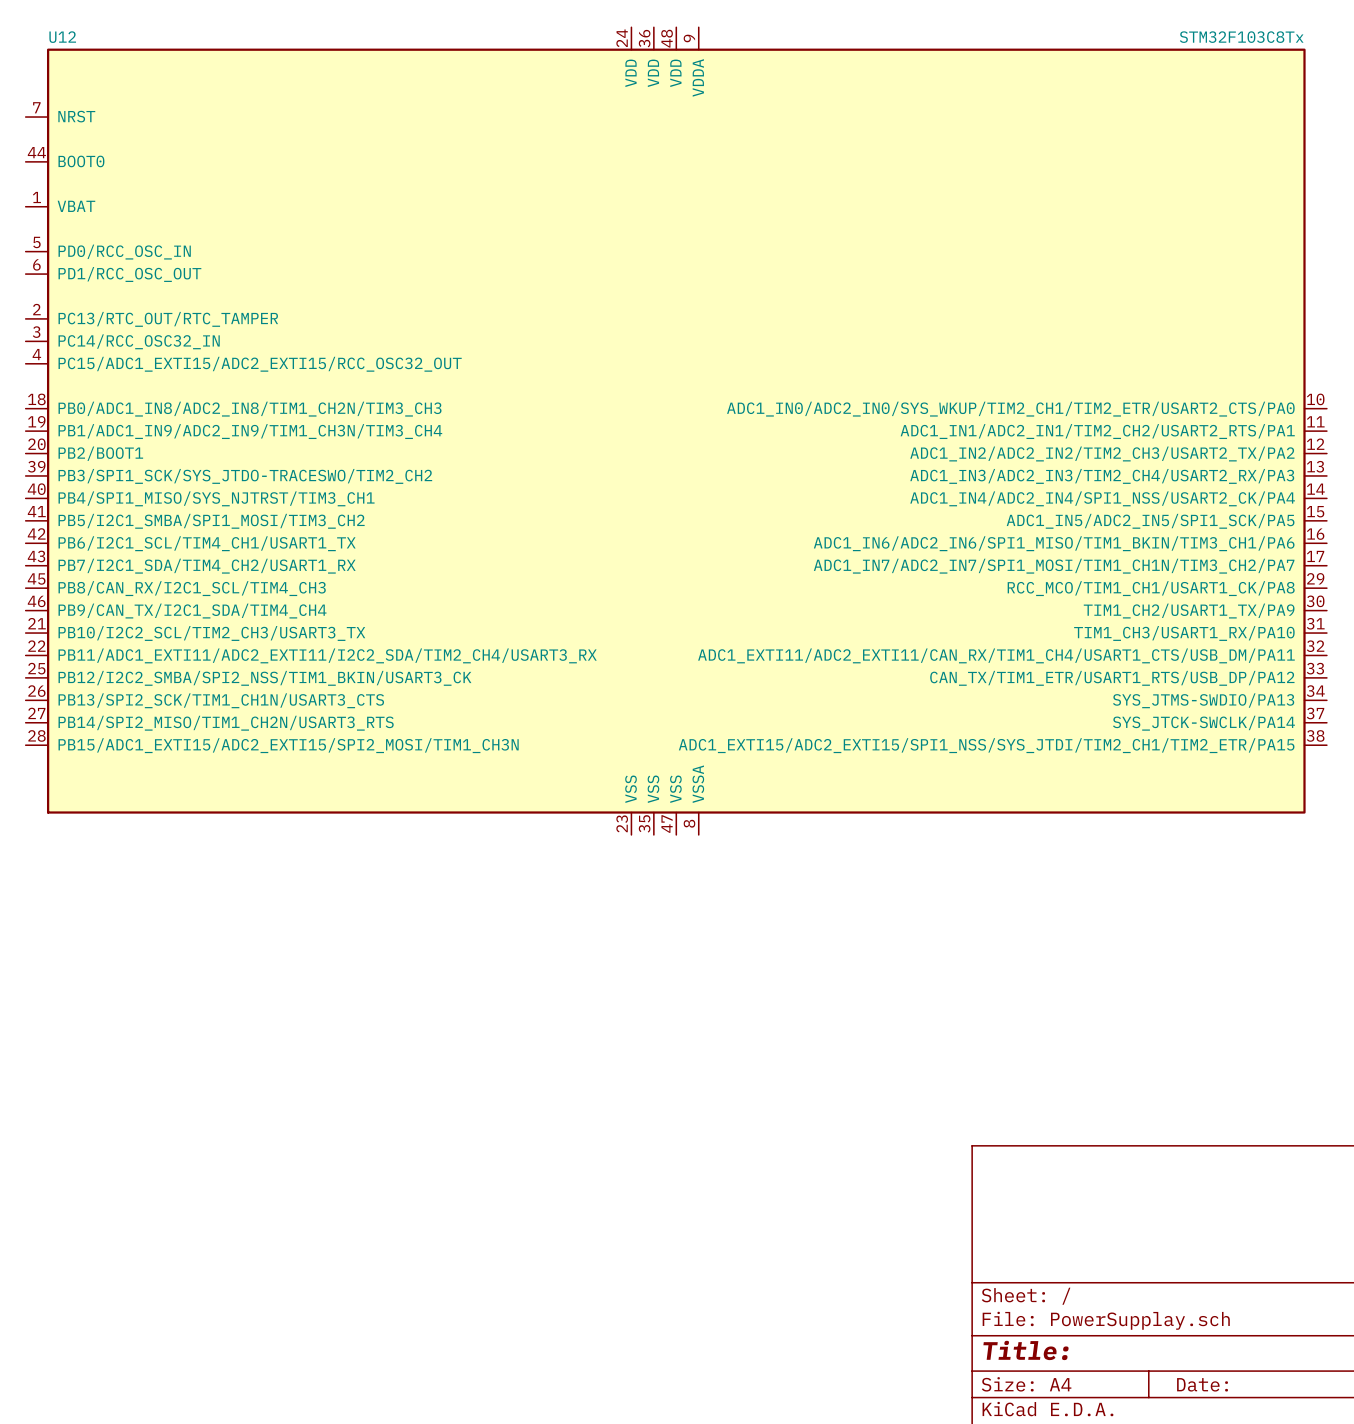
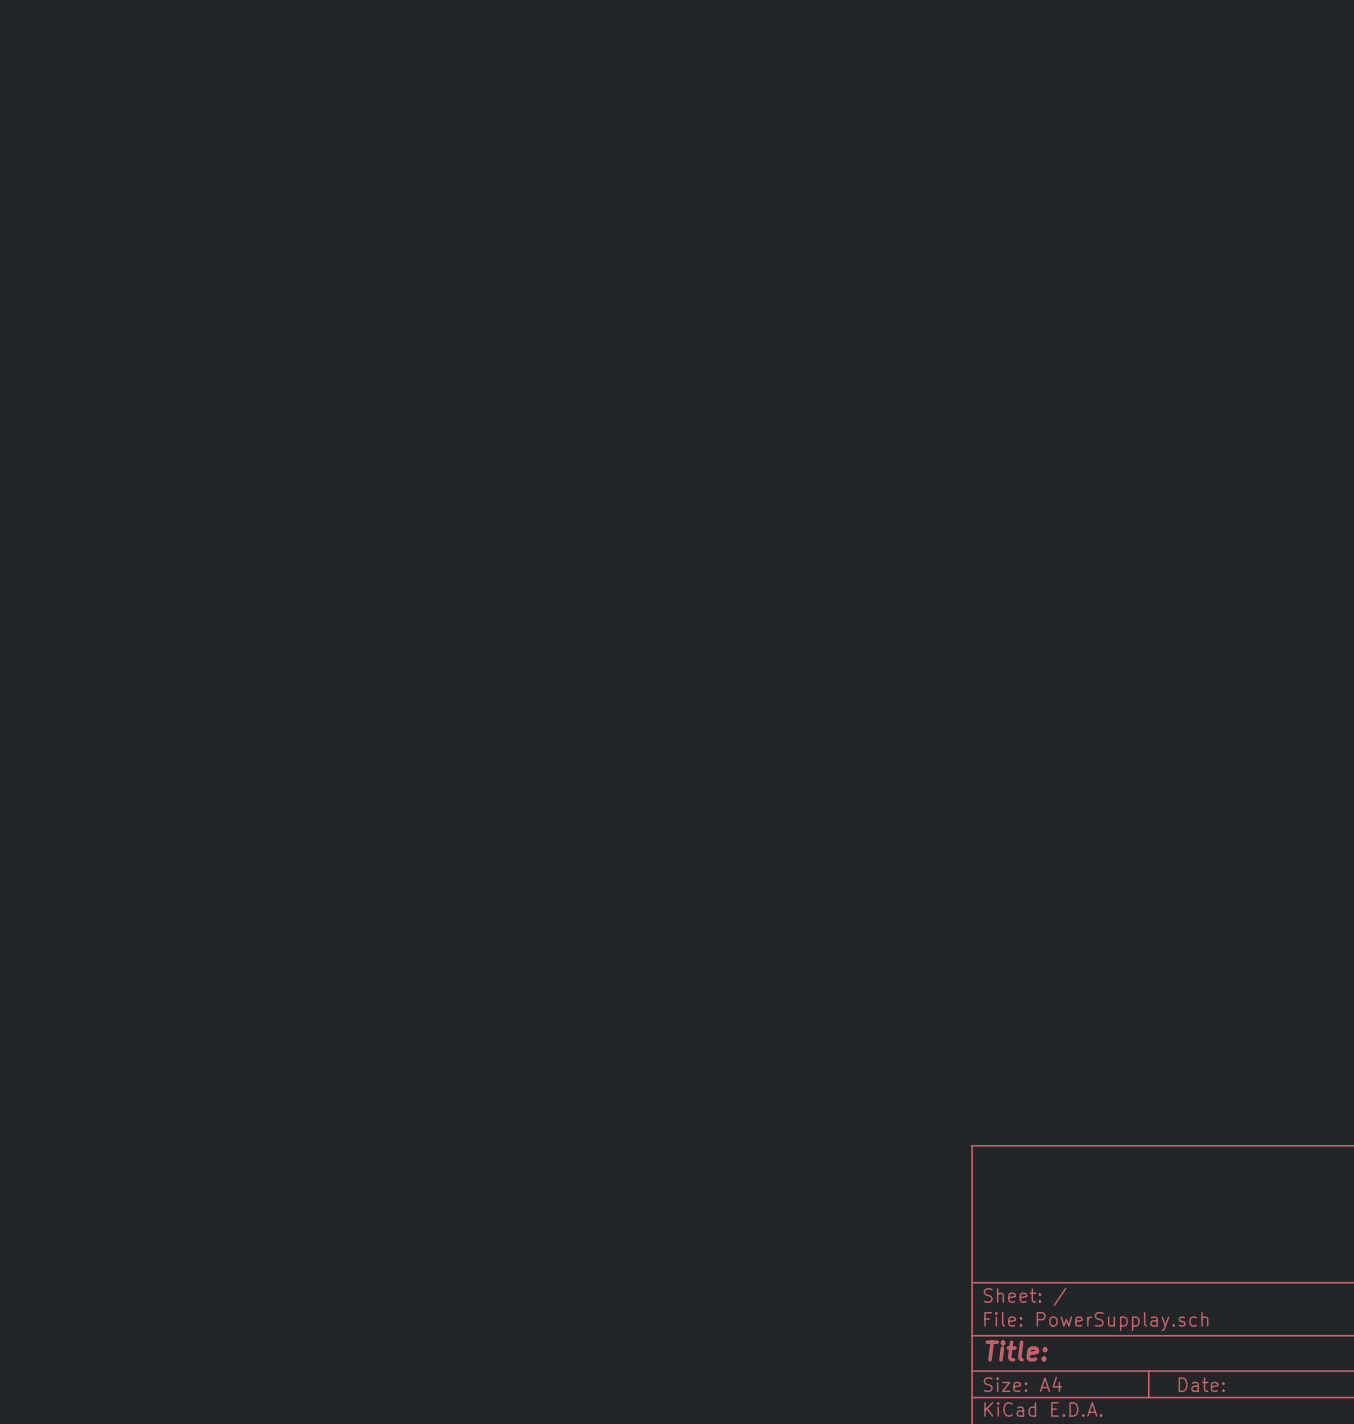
U12: STM32F103C8Tx (676, 431) -> none

